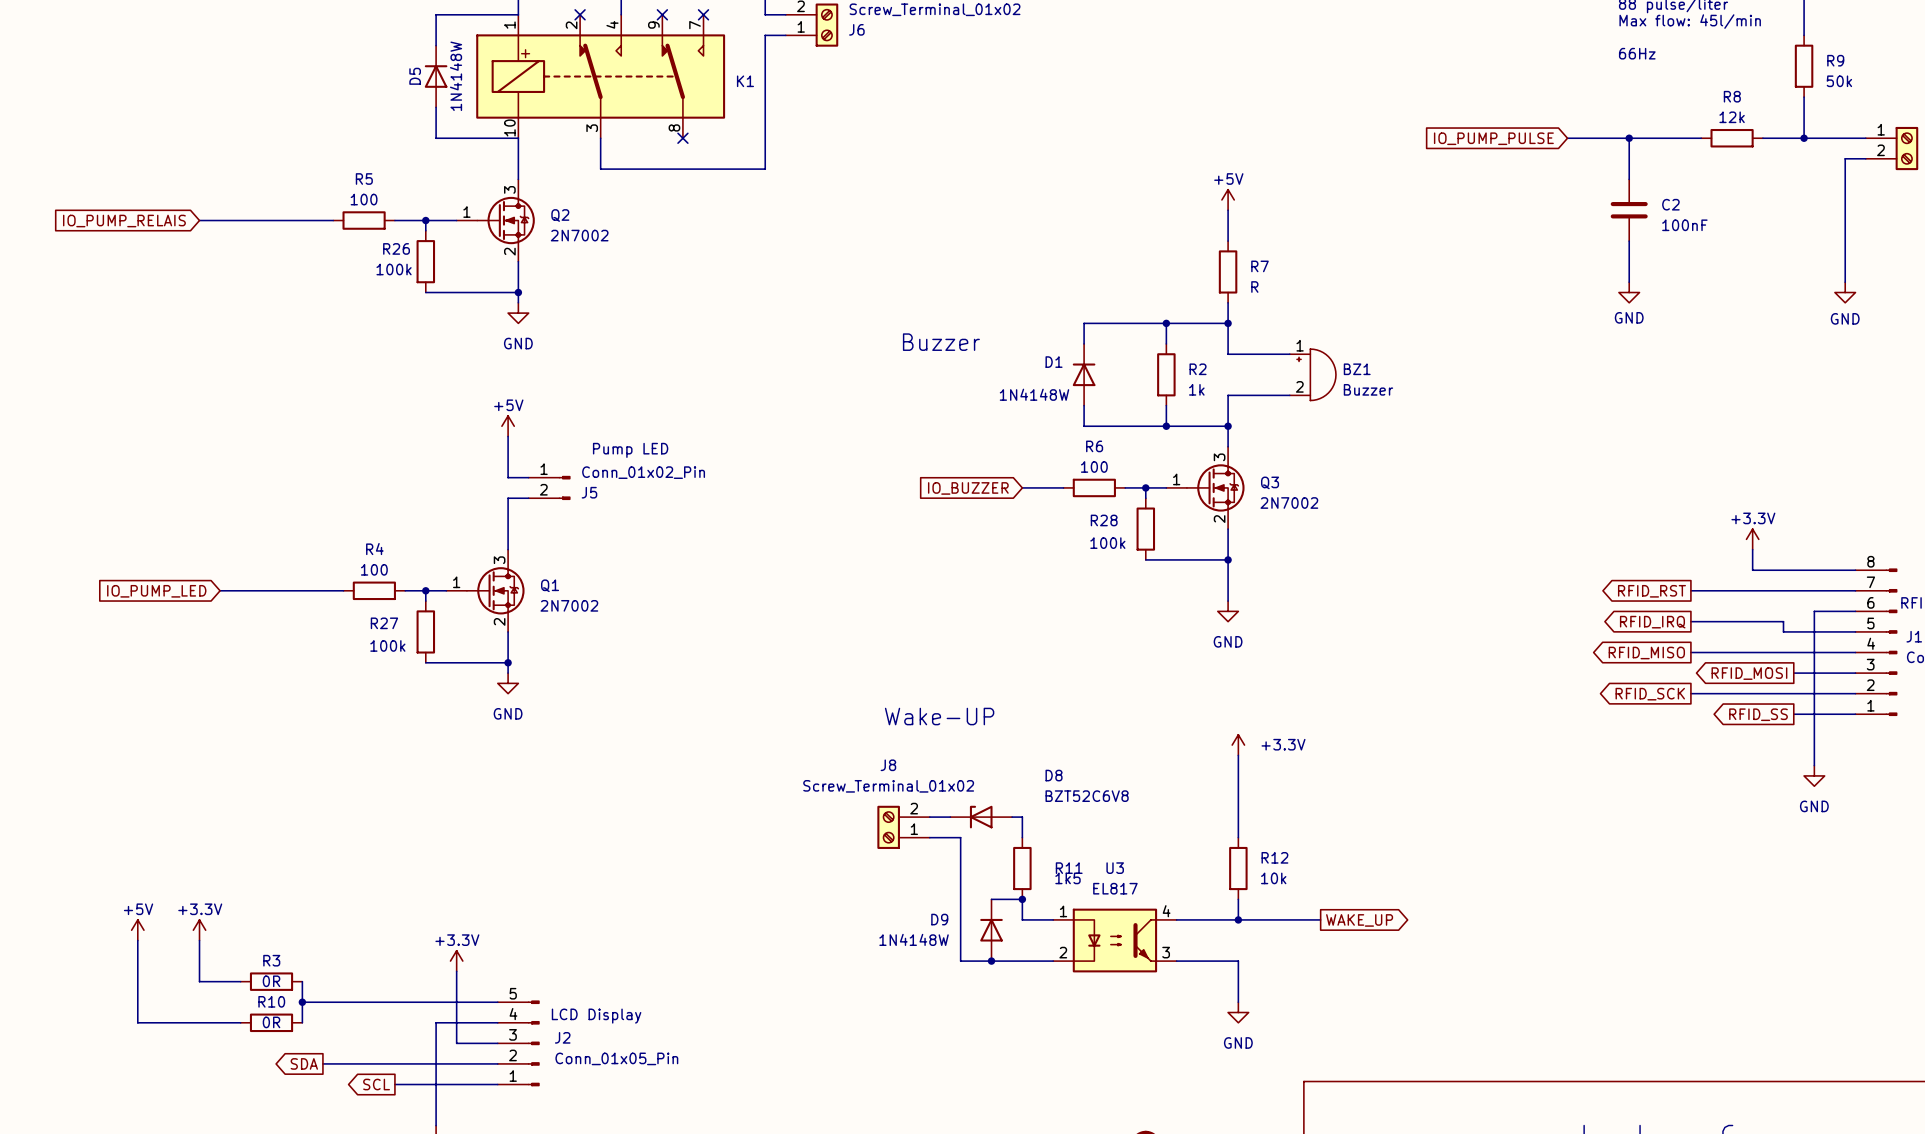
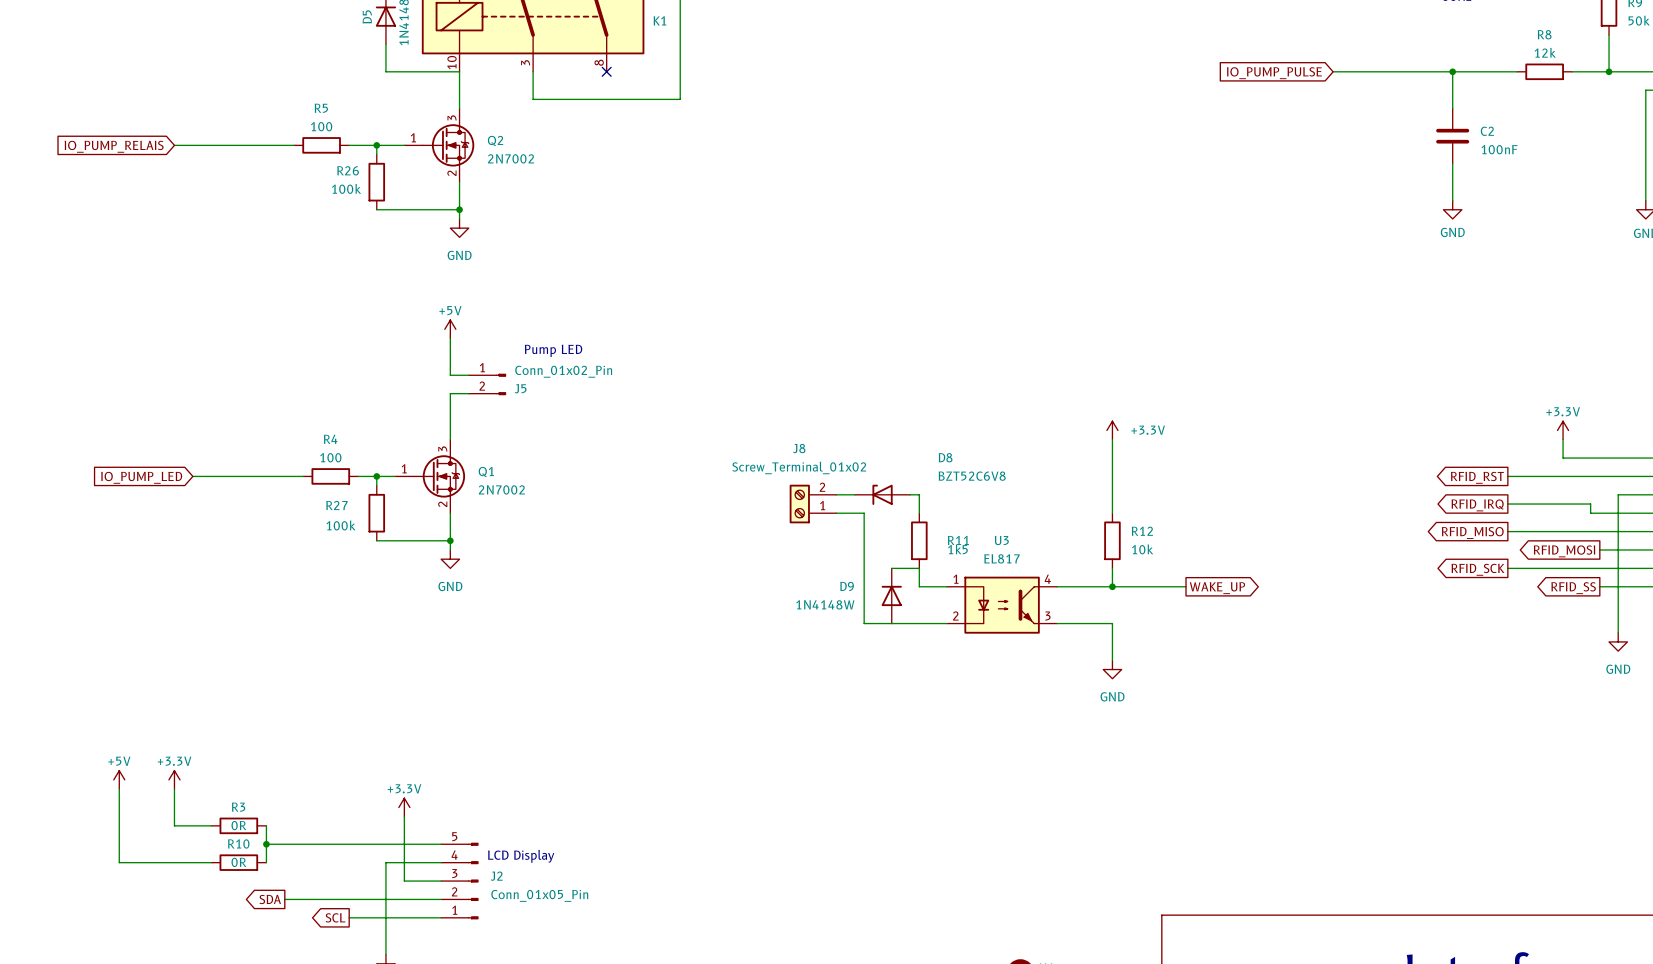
global label position: IO_PUMP_PULSE (1493, 138) -> IO_PUMP_PULSE (1274, 73)
wire: none -> (1333, 71) (1397, 71)
power symbol: +5V (1228, 199) -> none
wire: (1228, 210) (1228, 241) -> none
R7: R (1228, 271) -> none
wire: (1228, 302) (1228, 354) (1289, 354) -> none
wire: (1166, 323) (1166, 343) -> none
junction: (1166, 323) -> none
wire: (1228, 323) (1084, 323) (1084, 343) -> none
junction: (1228, 323) -> none
text: Buzzer (941, 342) -> none
D1: 1N4148W (1084, 374) -> none
R2: 1k (1166, 374) -> none
BZ1: Buzzer (1312, 374) -> none
wire: (1289, 395) (1228, 395) (1228, 446) -> none
wire: (1084, 405) (1084, 426) (1228, 426) -> none
wire: (1166, 405) (1166, 426) -> none
junction: (1166, 426) -> none
junction: (1228, 426) -> none
wire: (1022, 487) (1063, 487) -> none
R6: 100 (1094, 487) -> none
wire: (1125, 487) (1166, 487) -> none
wire: (1145, 487) (1145, 498) -> none
junction: (1145, 487) -> none
Q3: 2N7002 (1205, 487) -> none
global label: IO_BUZZER (968, 488) -> none
R28: 100k (1145, 529) -> none
wire: (1228, 529) (1228, 601) -> none
power symbol: none -> +3.3V (1112, 430)
wire: none -> (1112, 439) (1112, 513)
wire: (1145, 559) (1228, 559) -> none
junction: (1228, 559) -> none
wire: none -> (836, 494) (854, 494)
wire: none -> (910, 494) (919, 494) (919, 513)
power symbol: GND (1228, 611) -> none
wire: none -> (836, 513) (864, 513) (864, 623) (946, 623)
wire: none -> (891, 568) (919, 568) (919, 586) (946, 586)
wire: none -> (1112, 568) (1112, 586)
wire: none -> (1057, 586) (1186, 586)
junction: none -> (1112, 586)
global label: none -> WAKE_UP (1217, 588)
text: Wake-UP (939, 716) -> none
power symbol: +3.3V (1238, 745) -> none
wire: none -> (1057, 623) (1112, 623) (1112, 660)
wire: (1238, 755) (1238, 837) -> none
power symbol: none -> GND (1112, 669)
wire: (929, 817) (950, 817) -> none
D8 position: (981, 817) -> (882, 494)
wire: (1012, 817) (1022, 817) (1022, 837) -> none
J8 position: (903, 827) -> (813, 504)
wire: (929, 837) (960, 837) (960, 961) (1053, 961) -> none
R11 position: (1022, 868) -> (919, 540)
R12 position: (1238, 868) -> (1112, 540)
wire: (991, 899) (1022, 899) (1022, 919) (1053, 919) -> none
junction: (1022, 899) -> none
wire: (1238, 899) (1238, 919) -> none
wire: (1176, 919) (1320, 919) -> none
junction: (1238, 919) -> none
global label: WAKE_UP (1359, 920) -> none
D9 position: (991, 930) -> (891, 595)
U3 position: (1114, 940) -> (1002, 605)
junction: (991, 961) -> none
wire: (1176, 961) (1238, 961) (1238, 1002) -> none
power symbol: GND (1238, 1012) -> none

